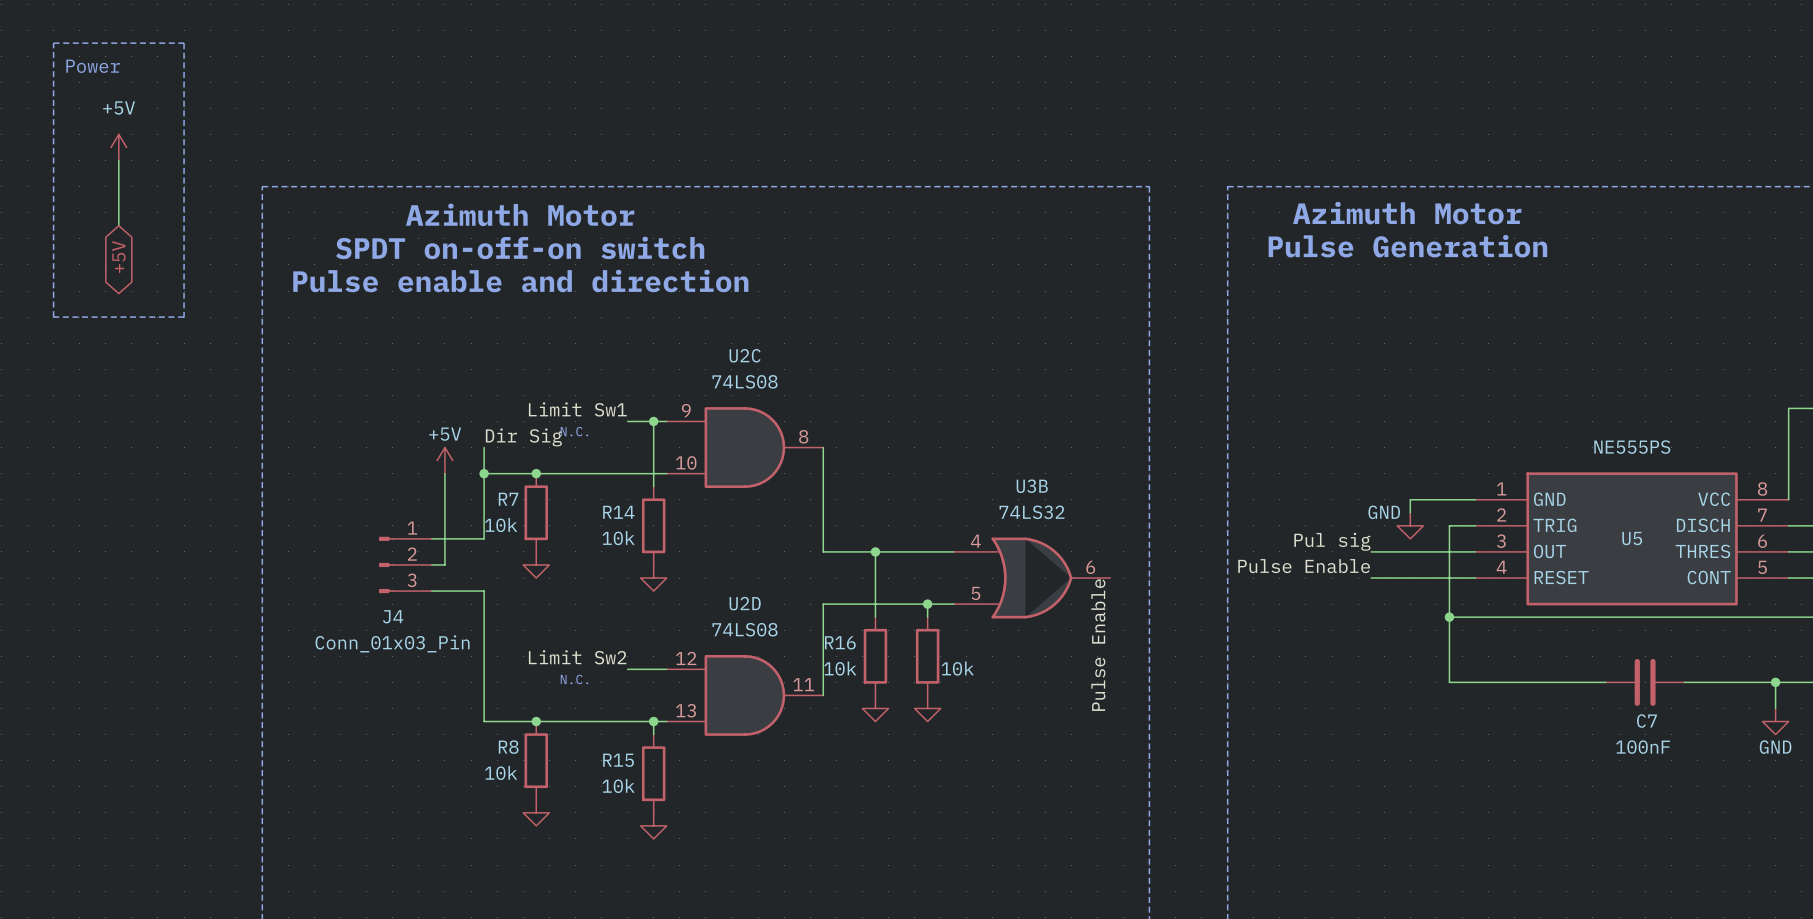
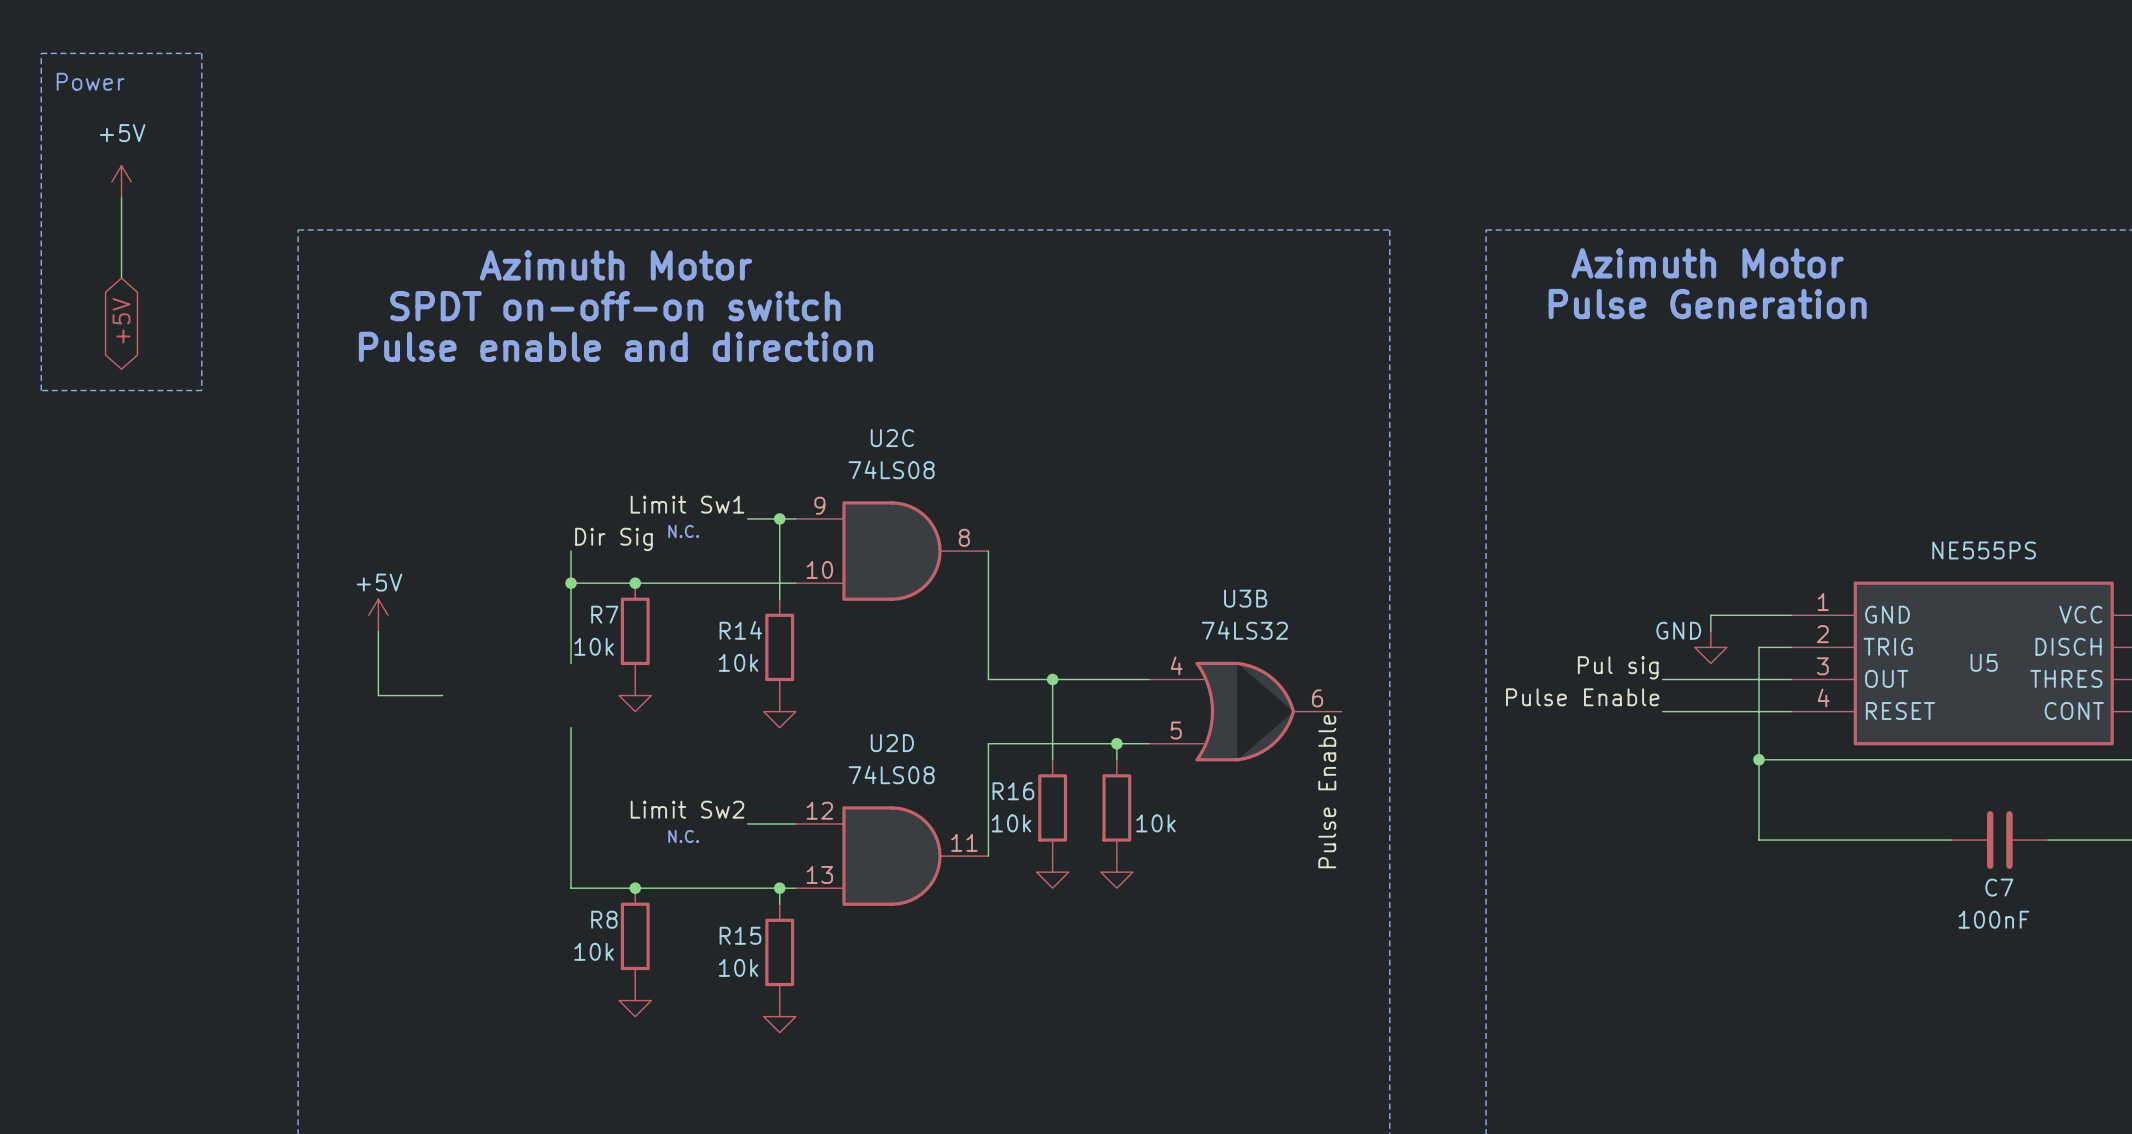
power symbol position: +5V (444, 460) -> +5V (378, 615)
wire: (444, 473) (444, 564) (431, 564) -> none
wire: none -> (378, 631) (378, 695) (442, 695)
wire: (431, 538) (484, 538) -> none
J4: Conn_01x03_Pin (405, 564) -> none
wire: (431, 591) (484, 591) -> none

